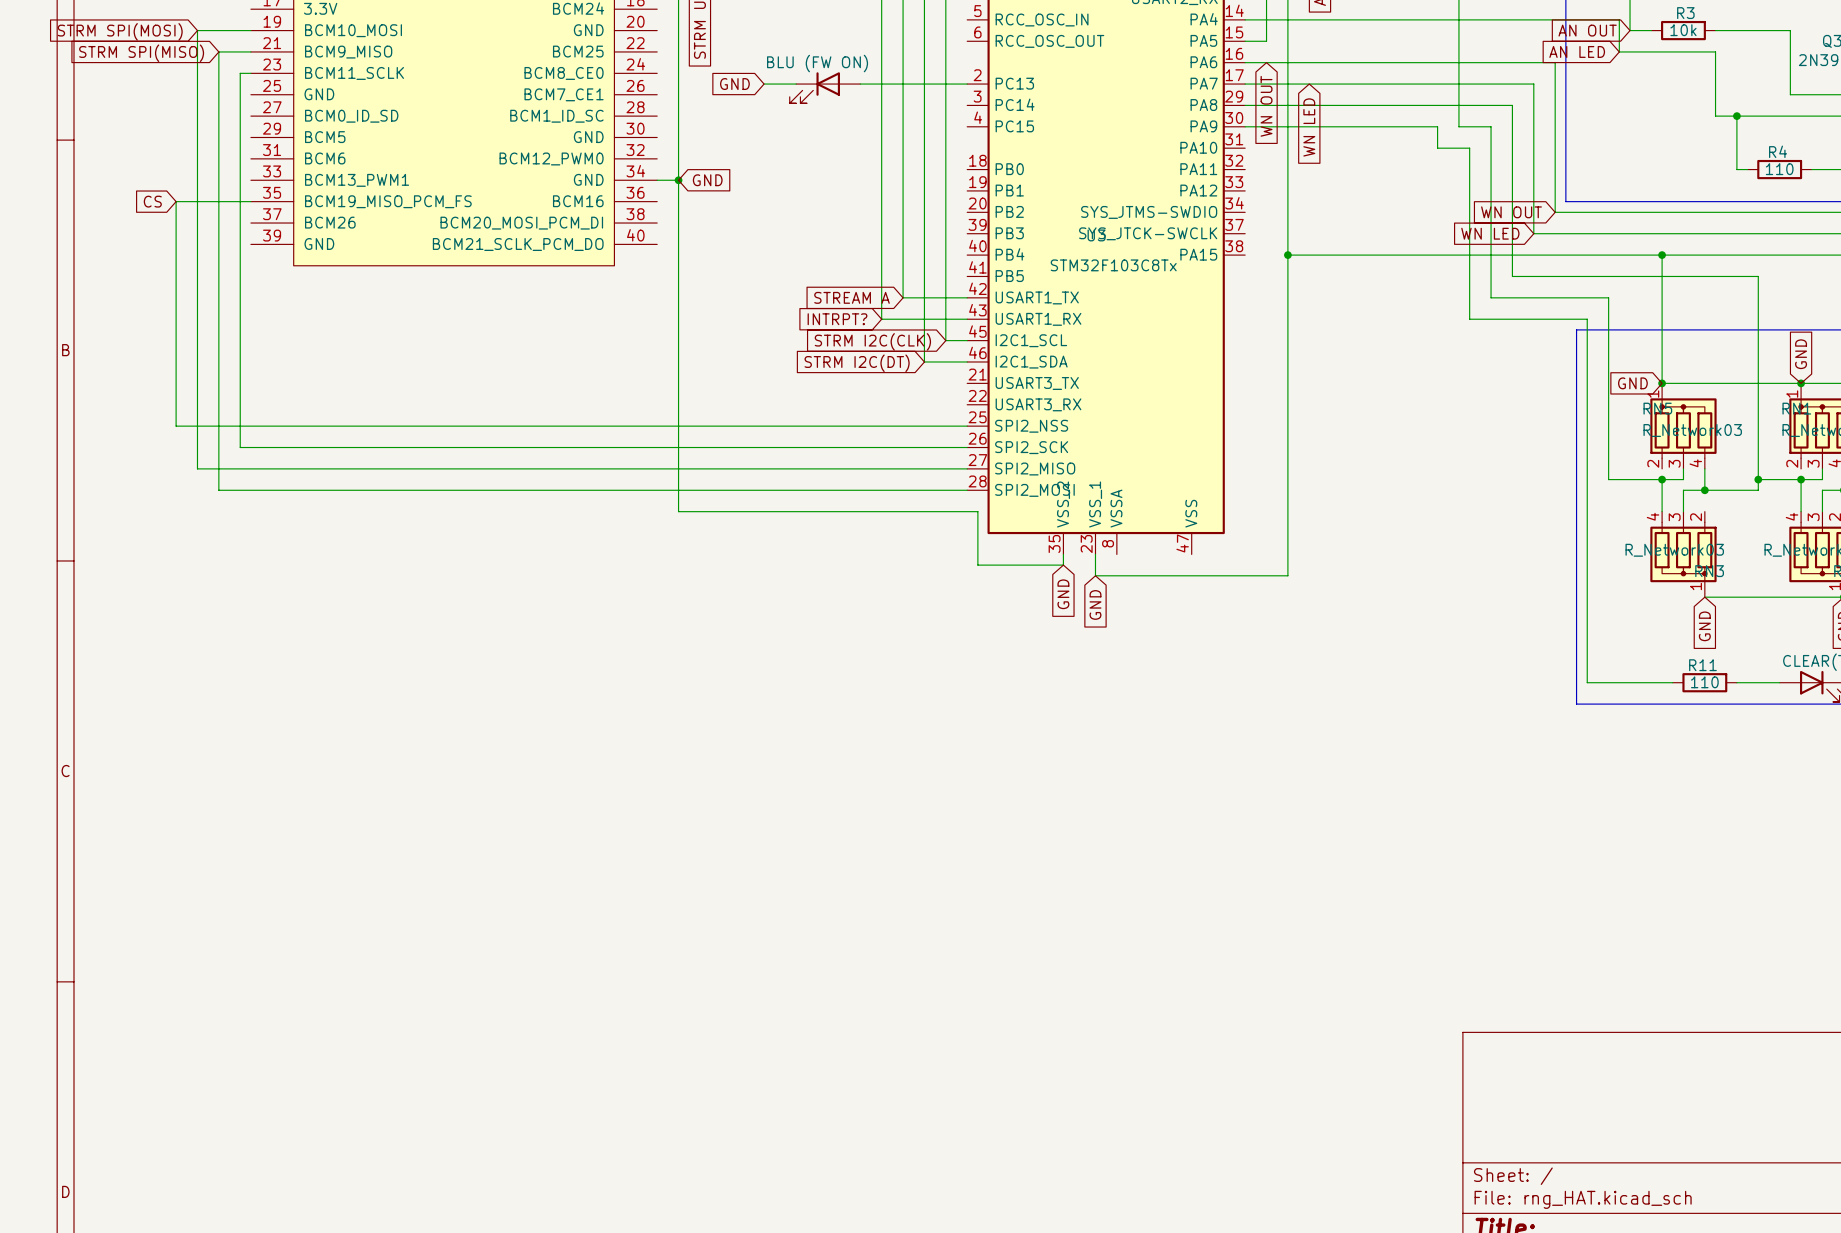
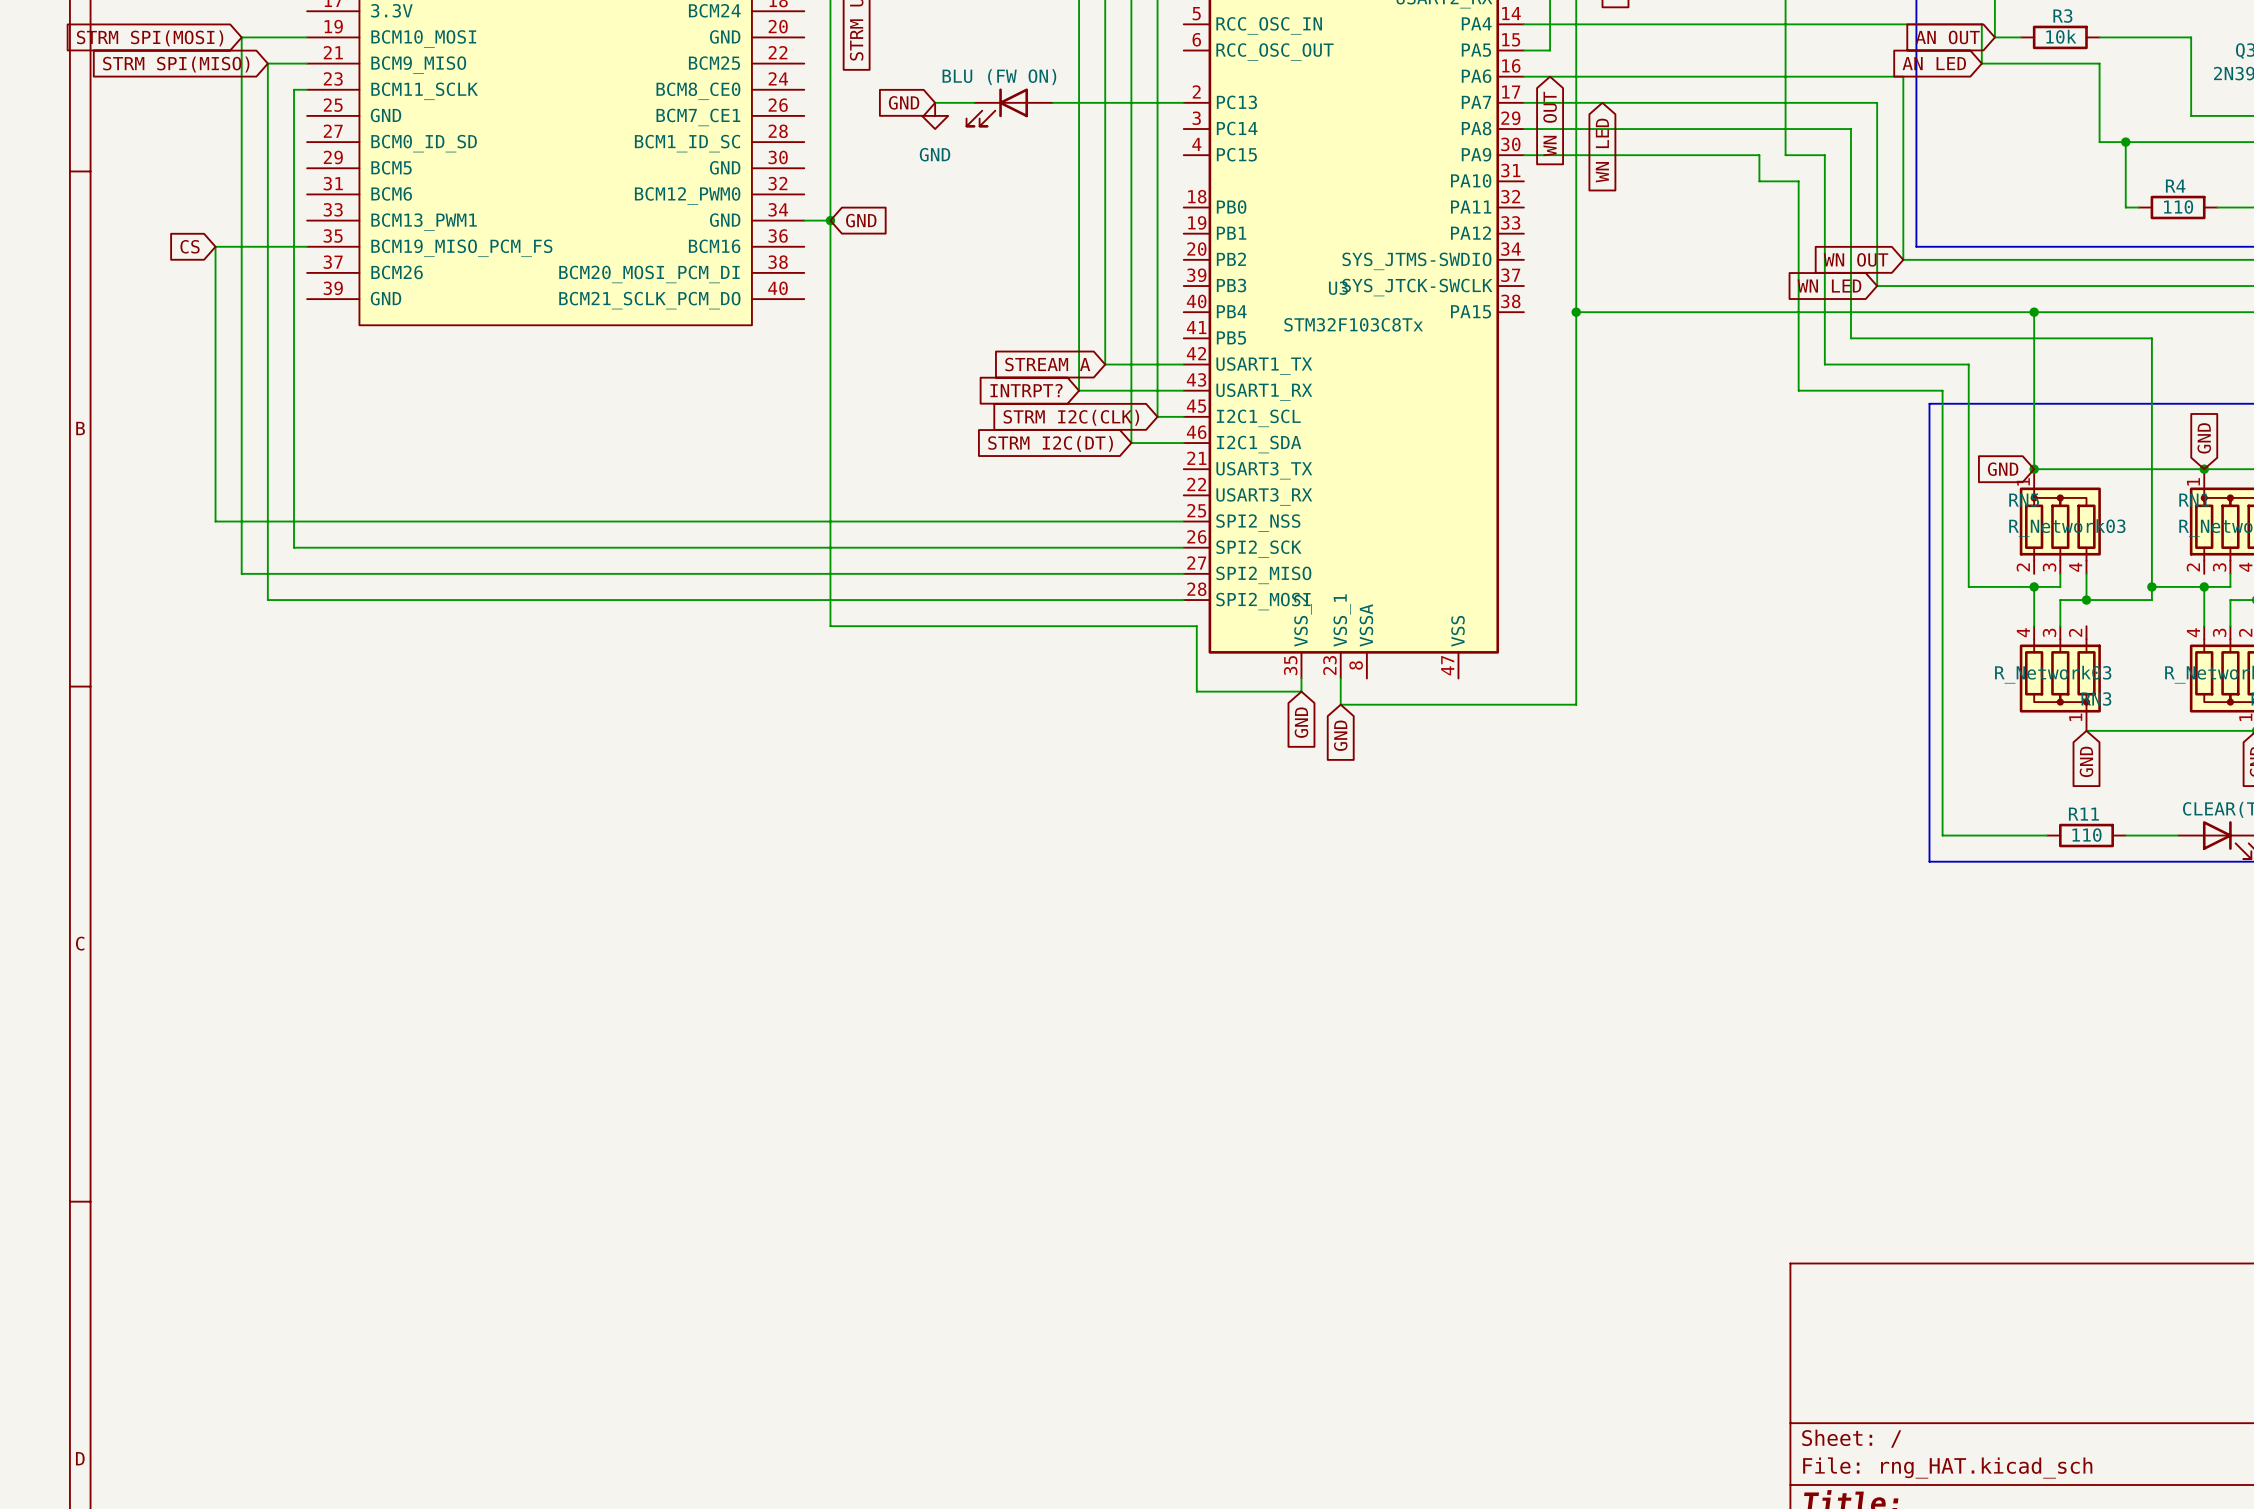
power symbol: none -> GND (935, 115)

